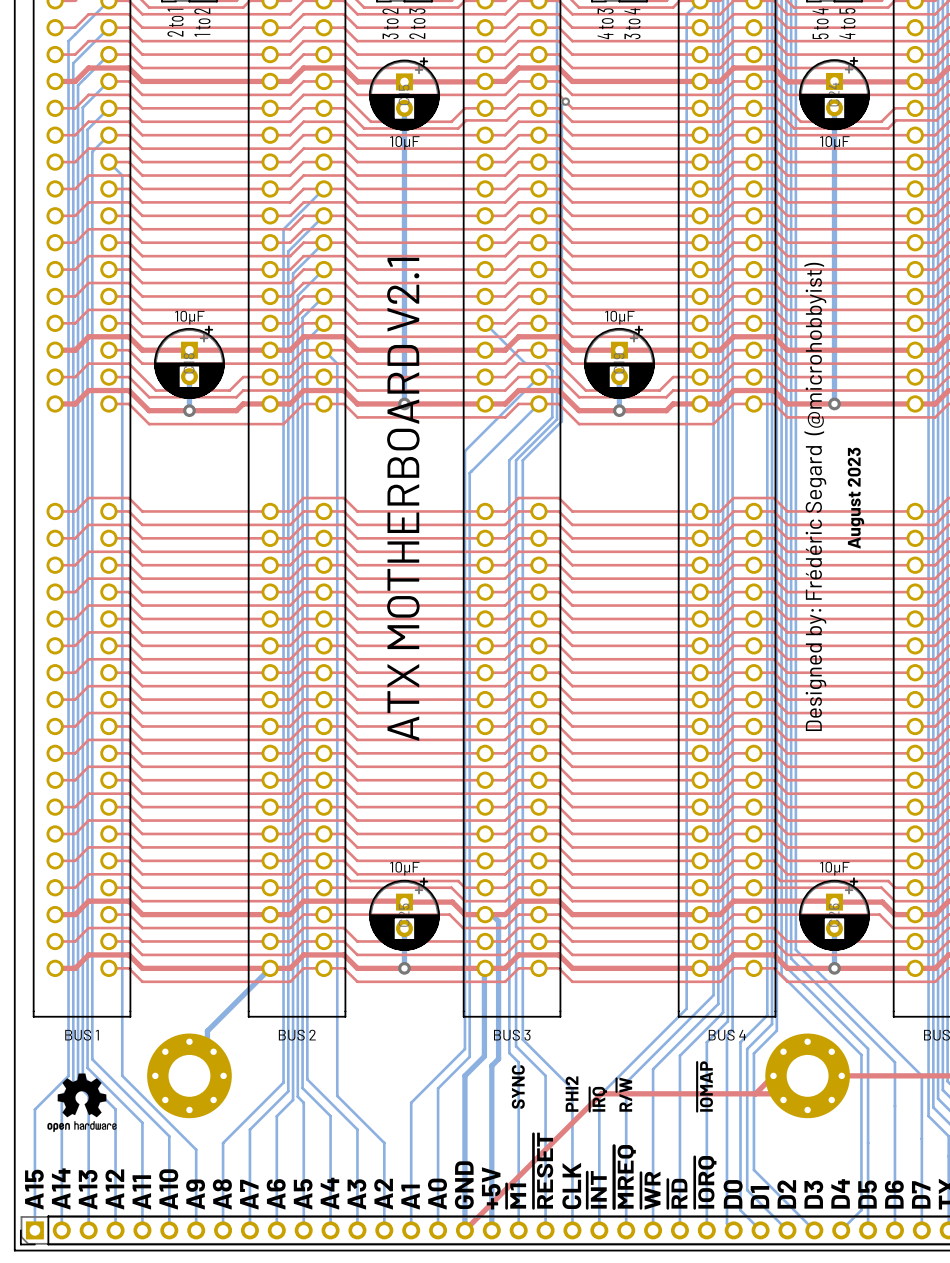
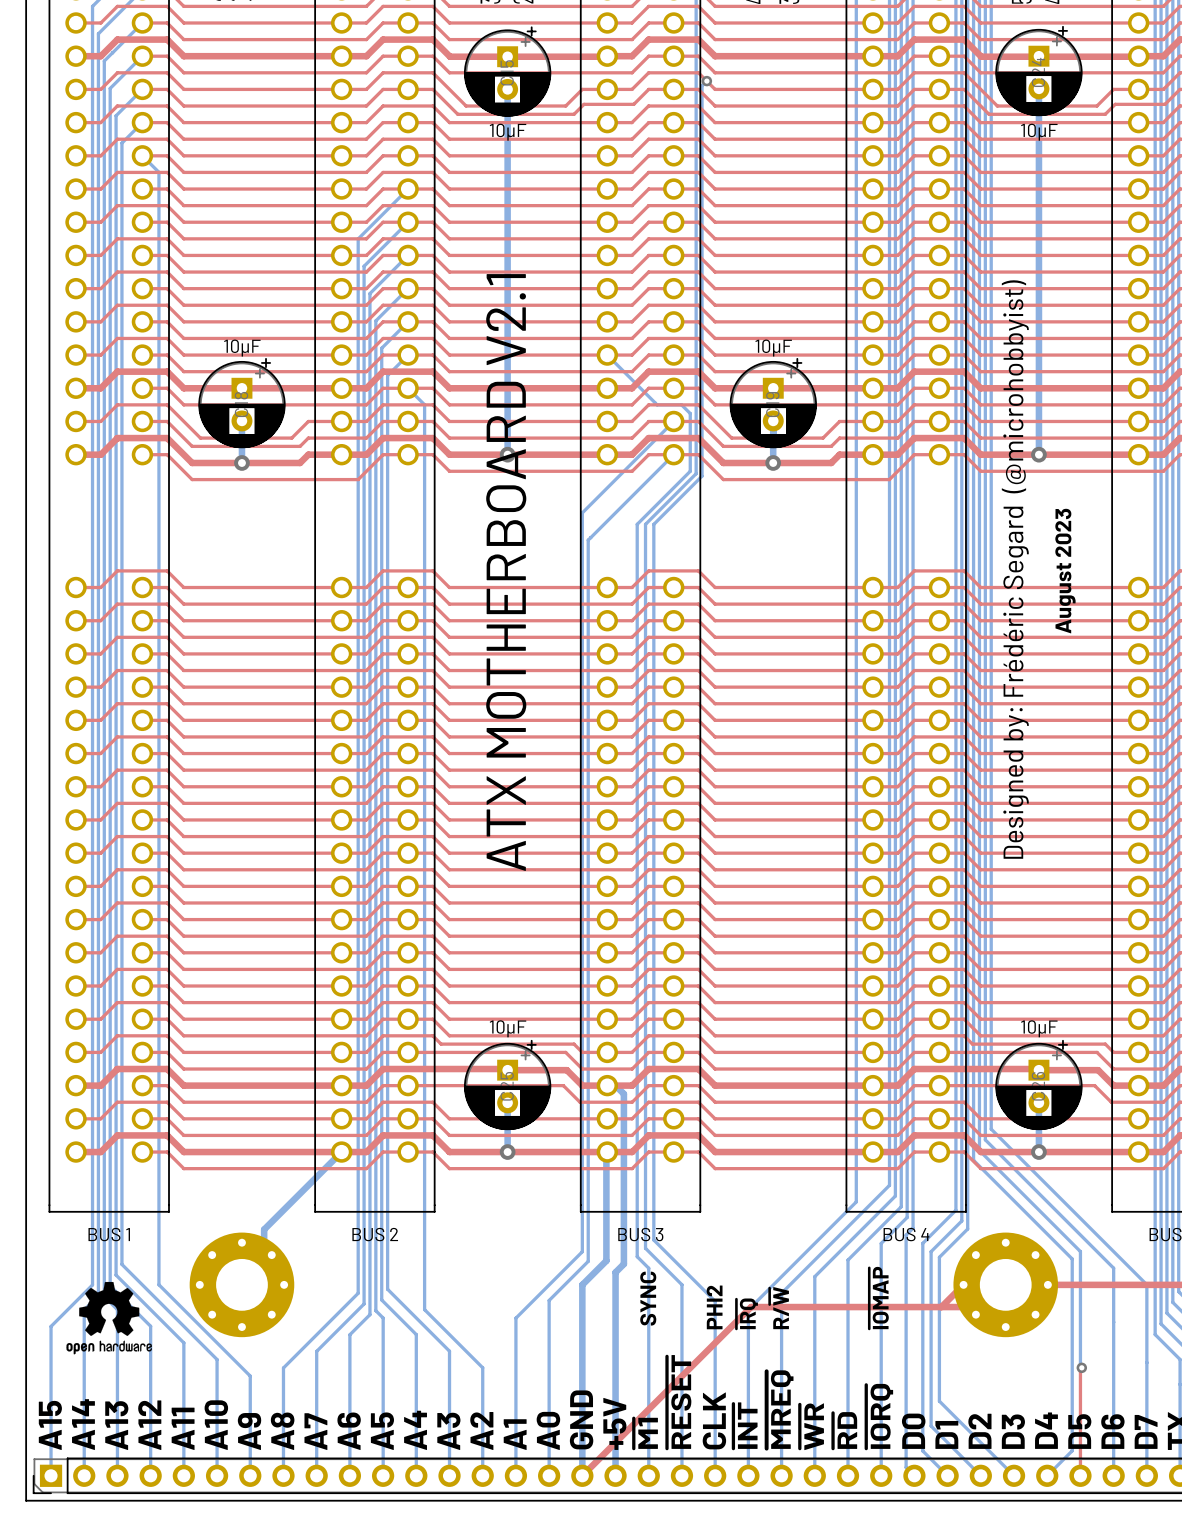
top track: none -> (1081, 1367) (1080, 1475)
via: none -> (1081, 1367)

